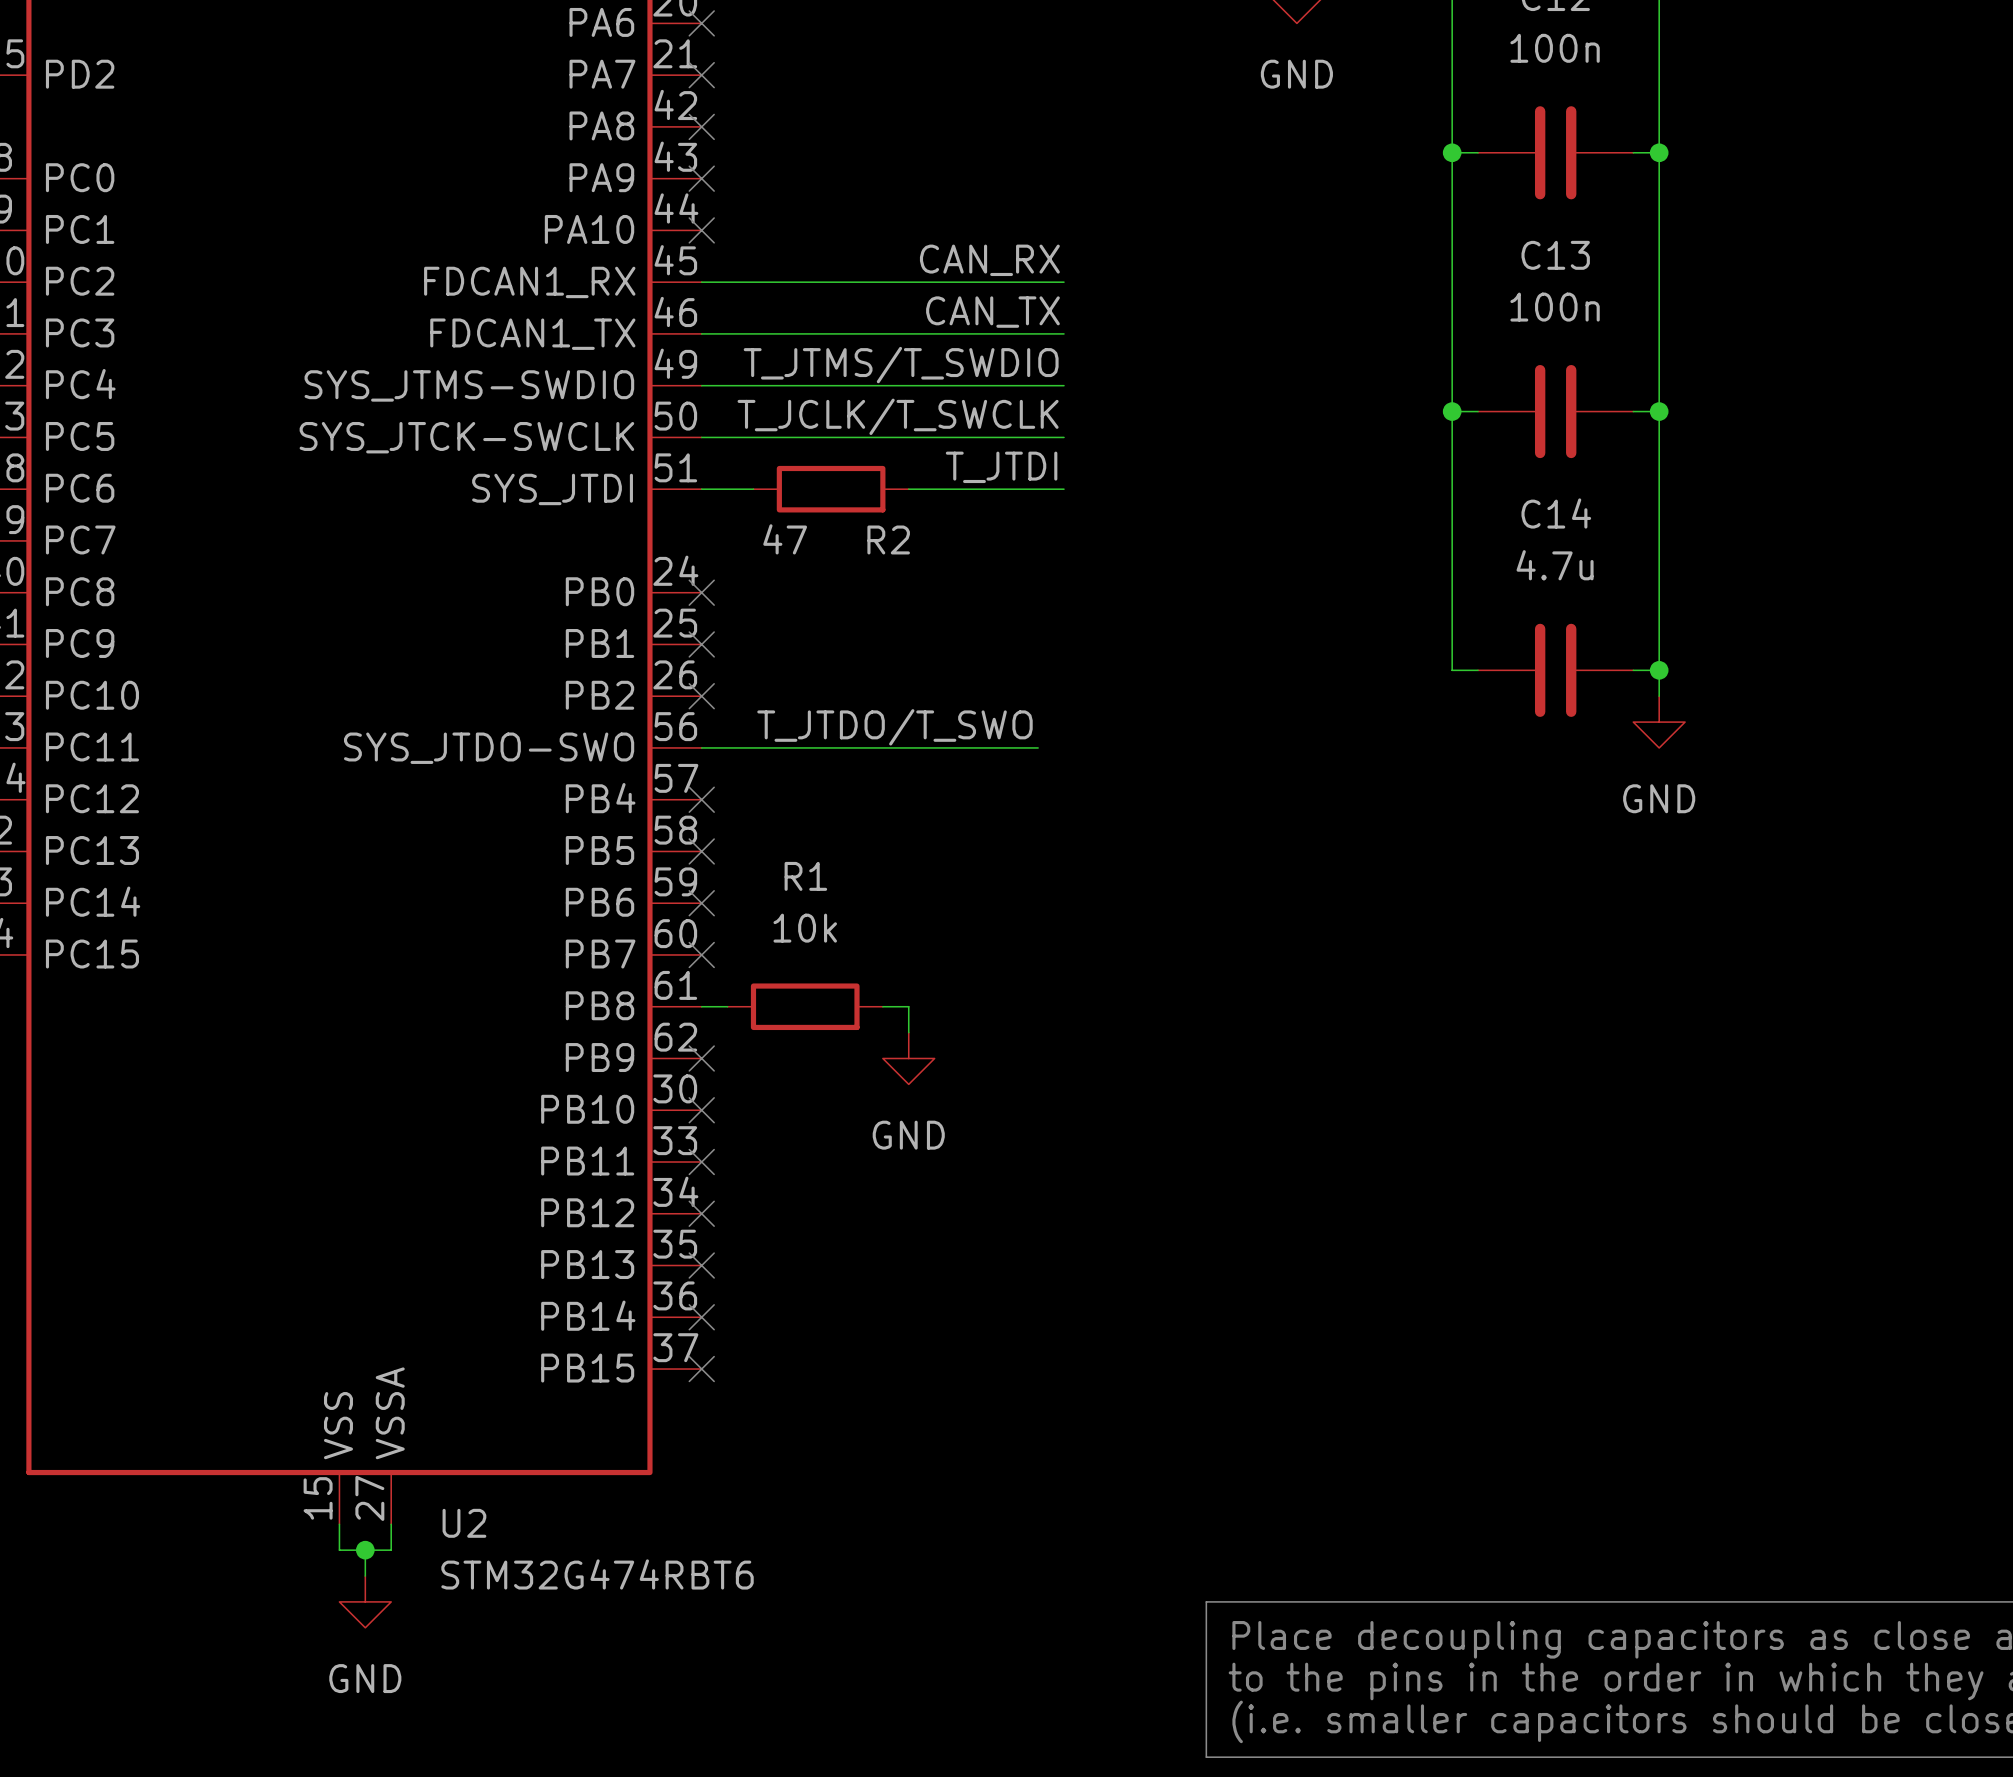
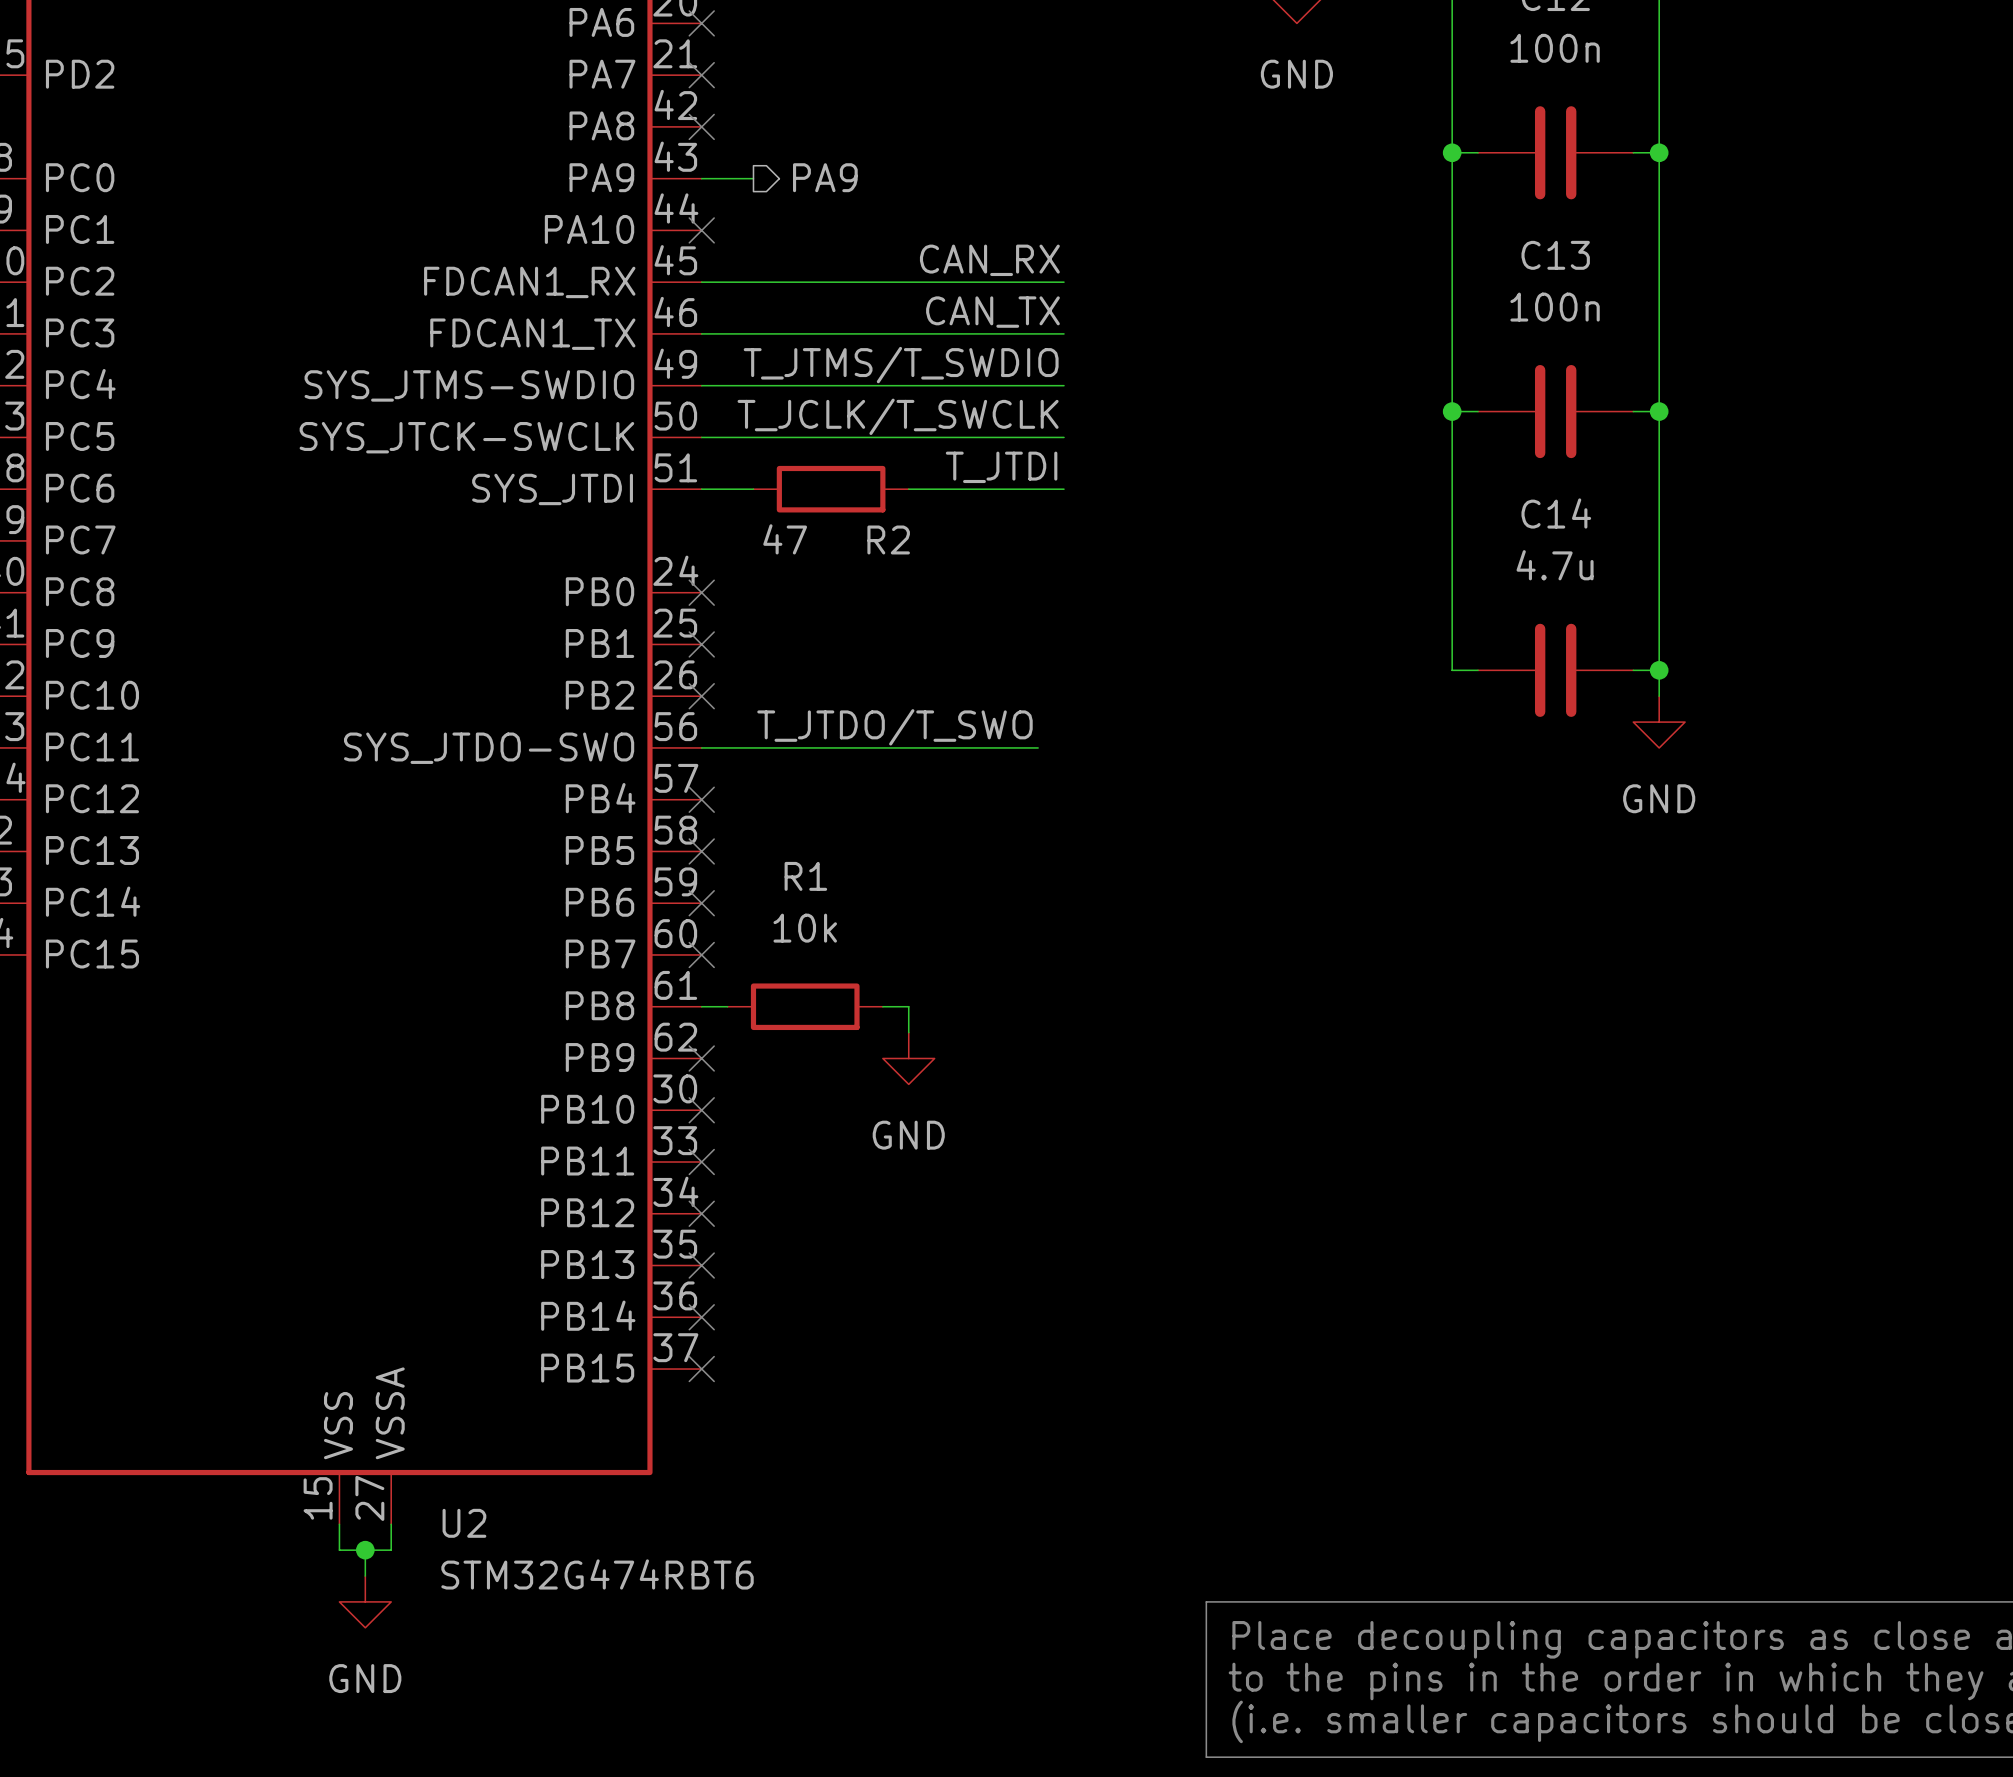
hierarchical label: none -> PA9 (825, 177)
wire: none -> (701, 178) (753, 178)
no-connect mark: (701, 178) -> none

